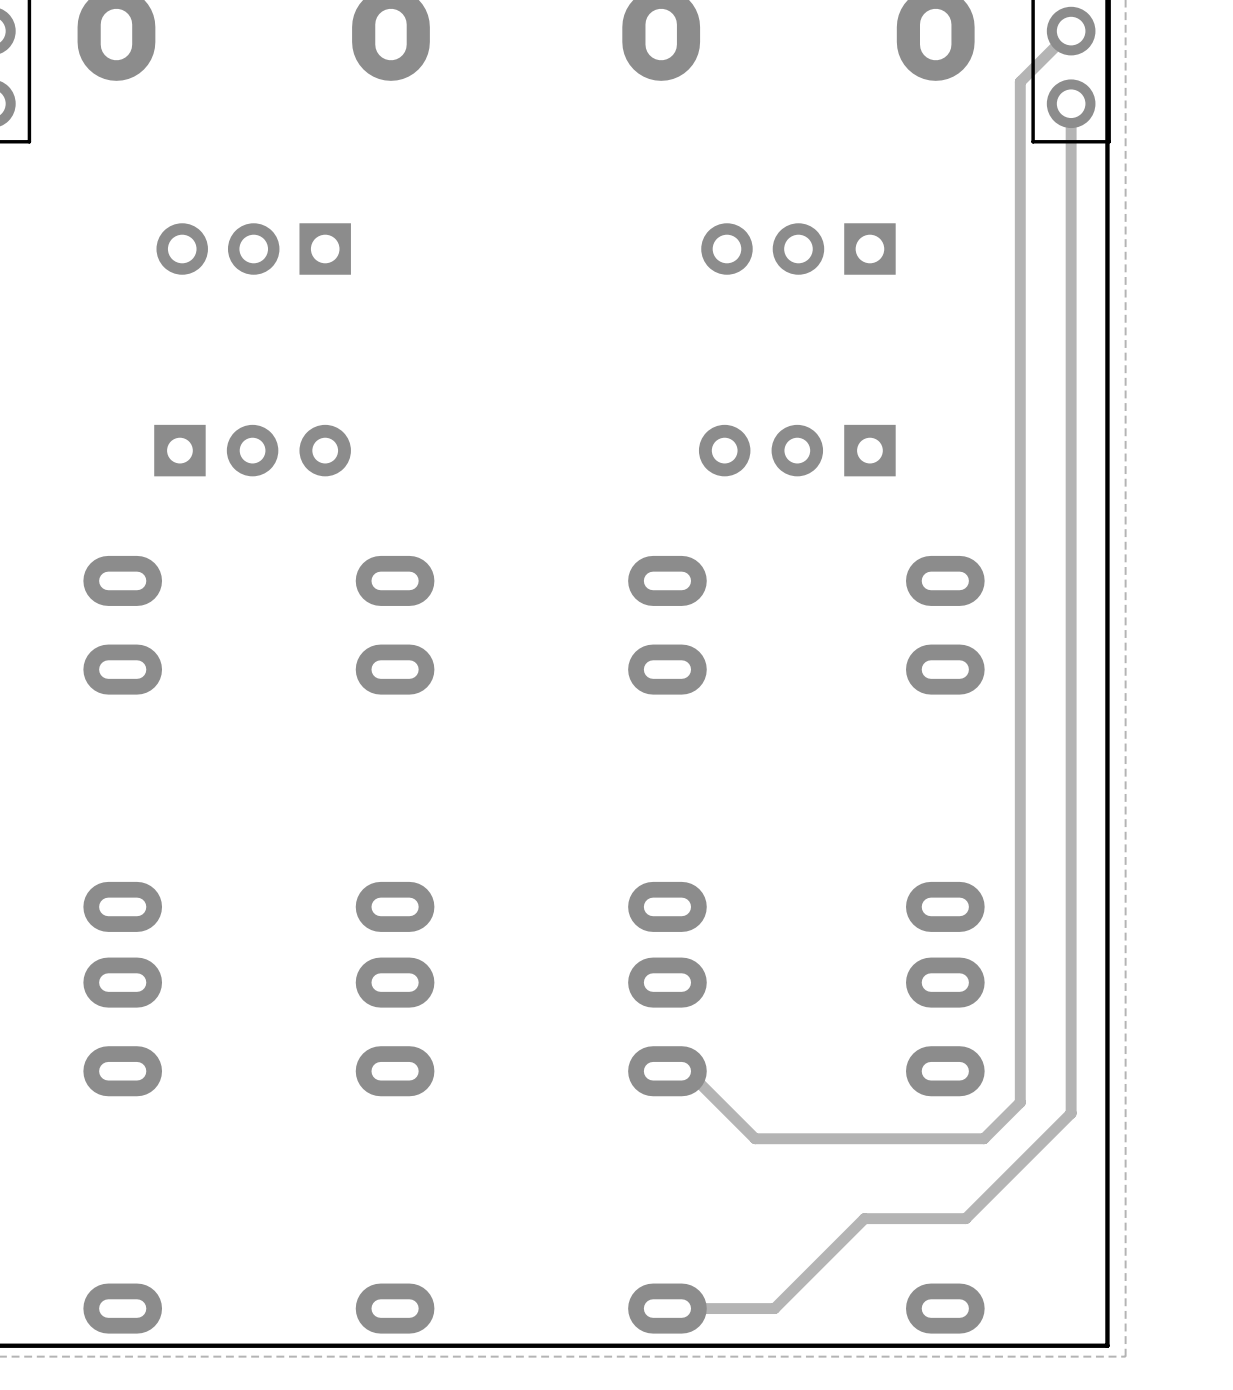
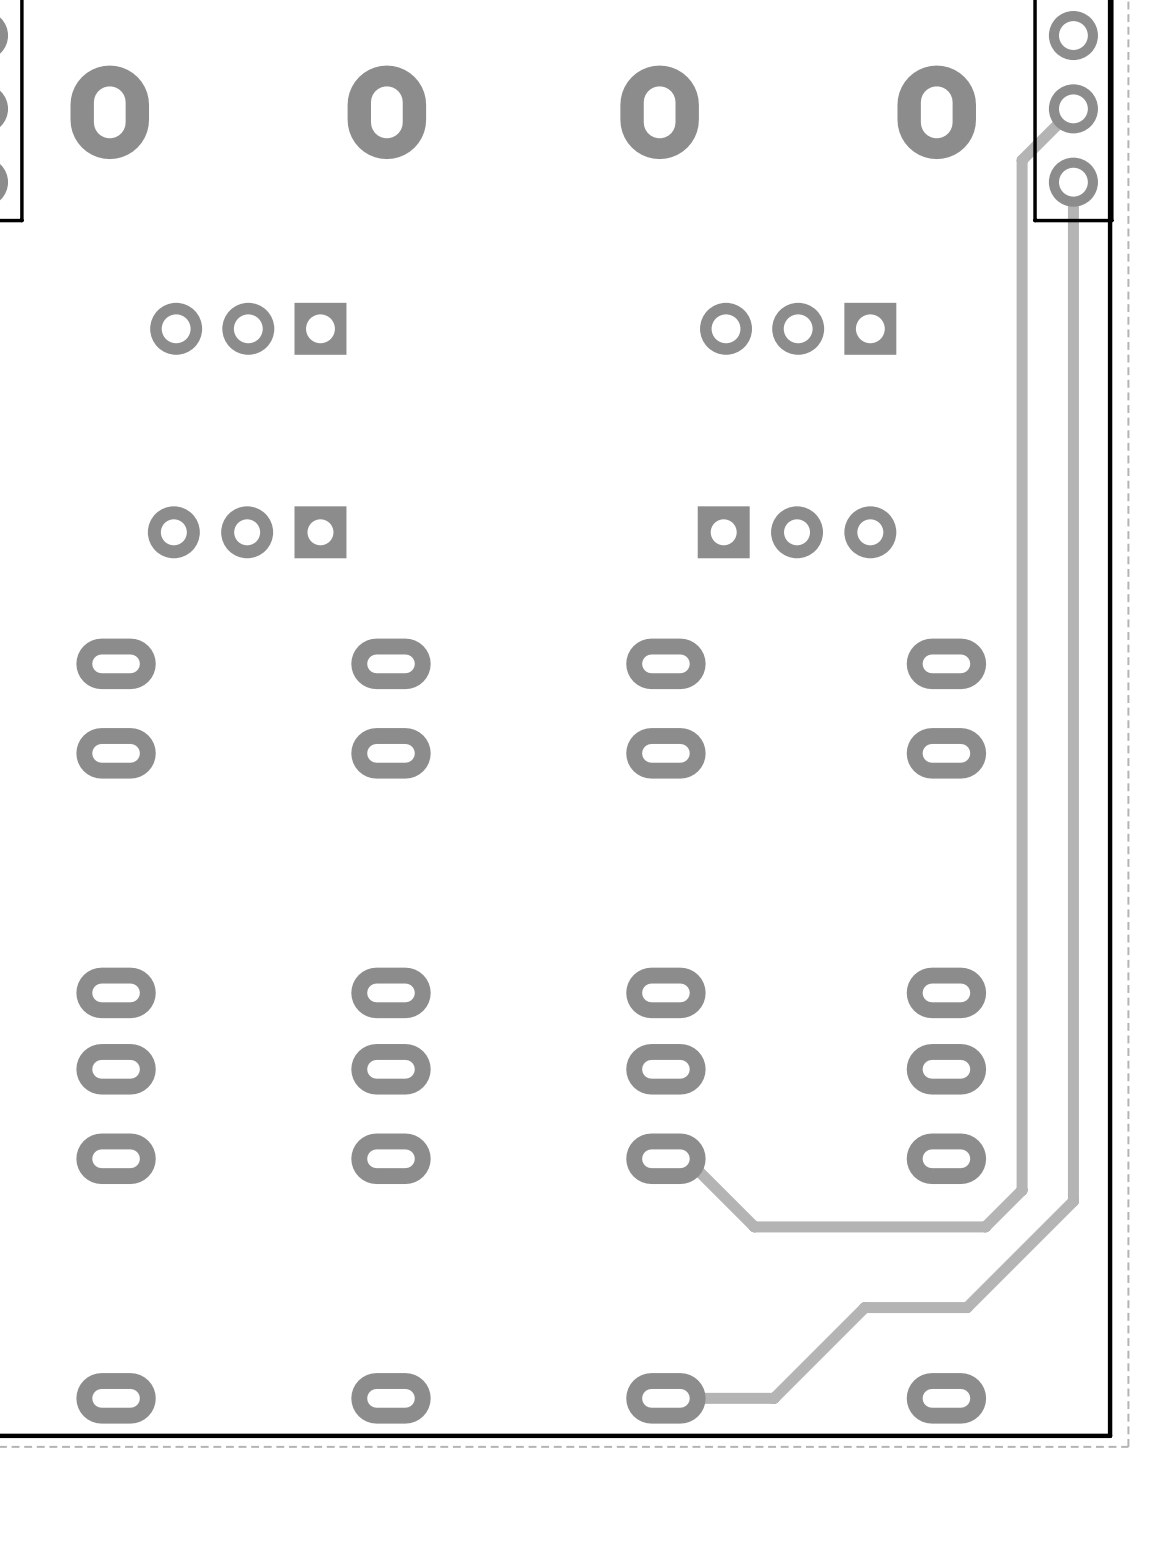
part rotation: 0° (252, 450) -> 180° (247, 532)
part rotation: 0° (797, 450) -> 180° (797, 532)

